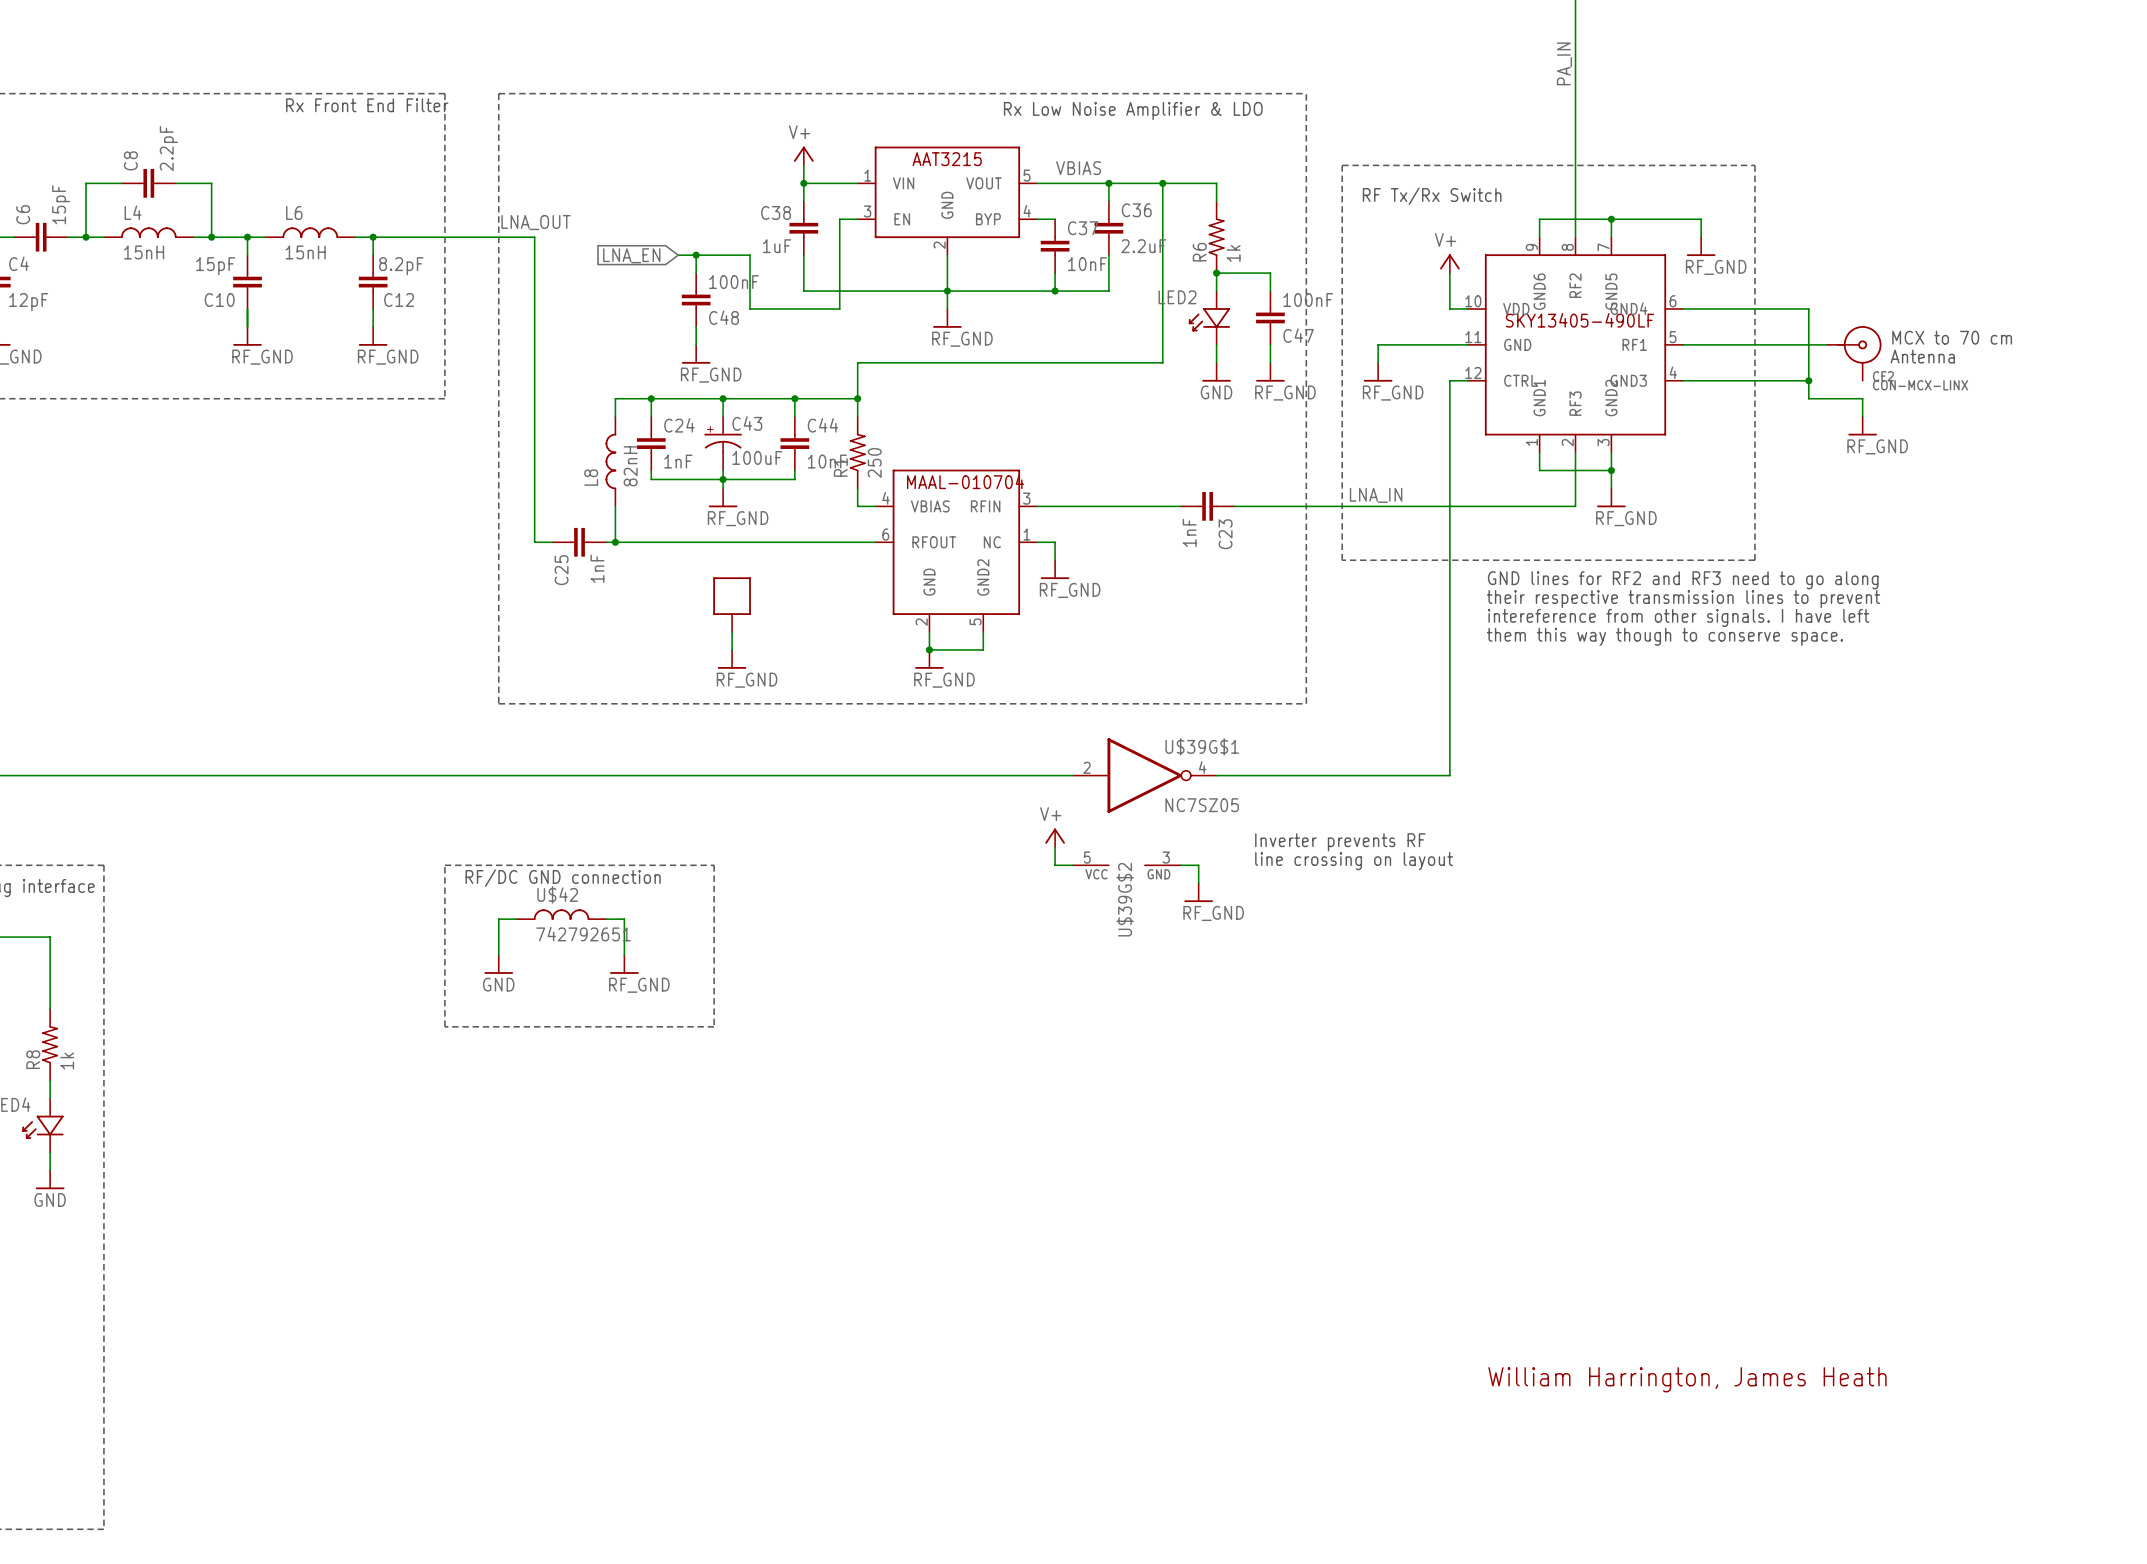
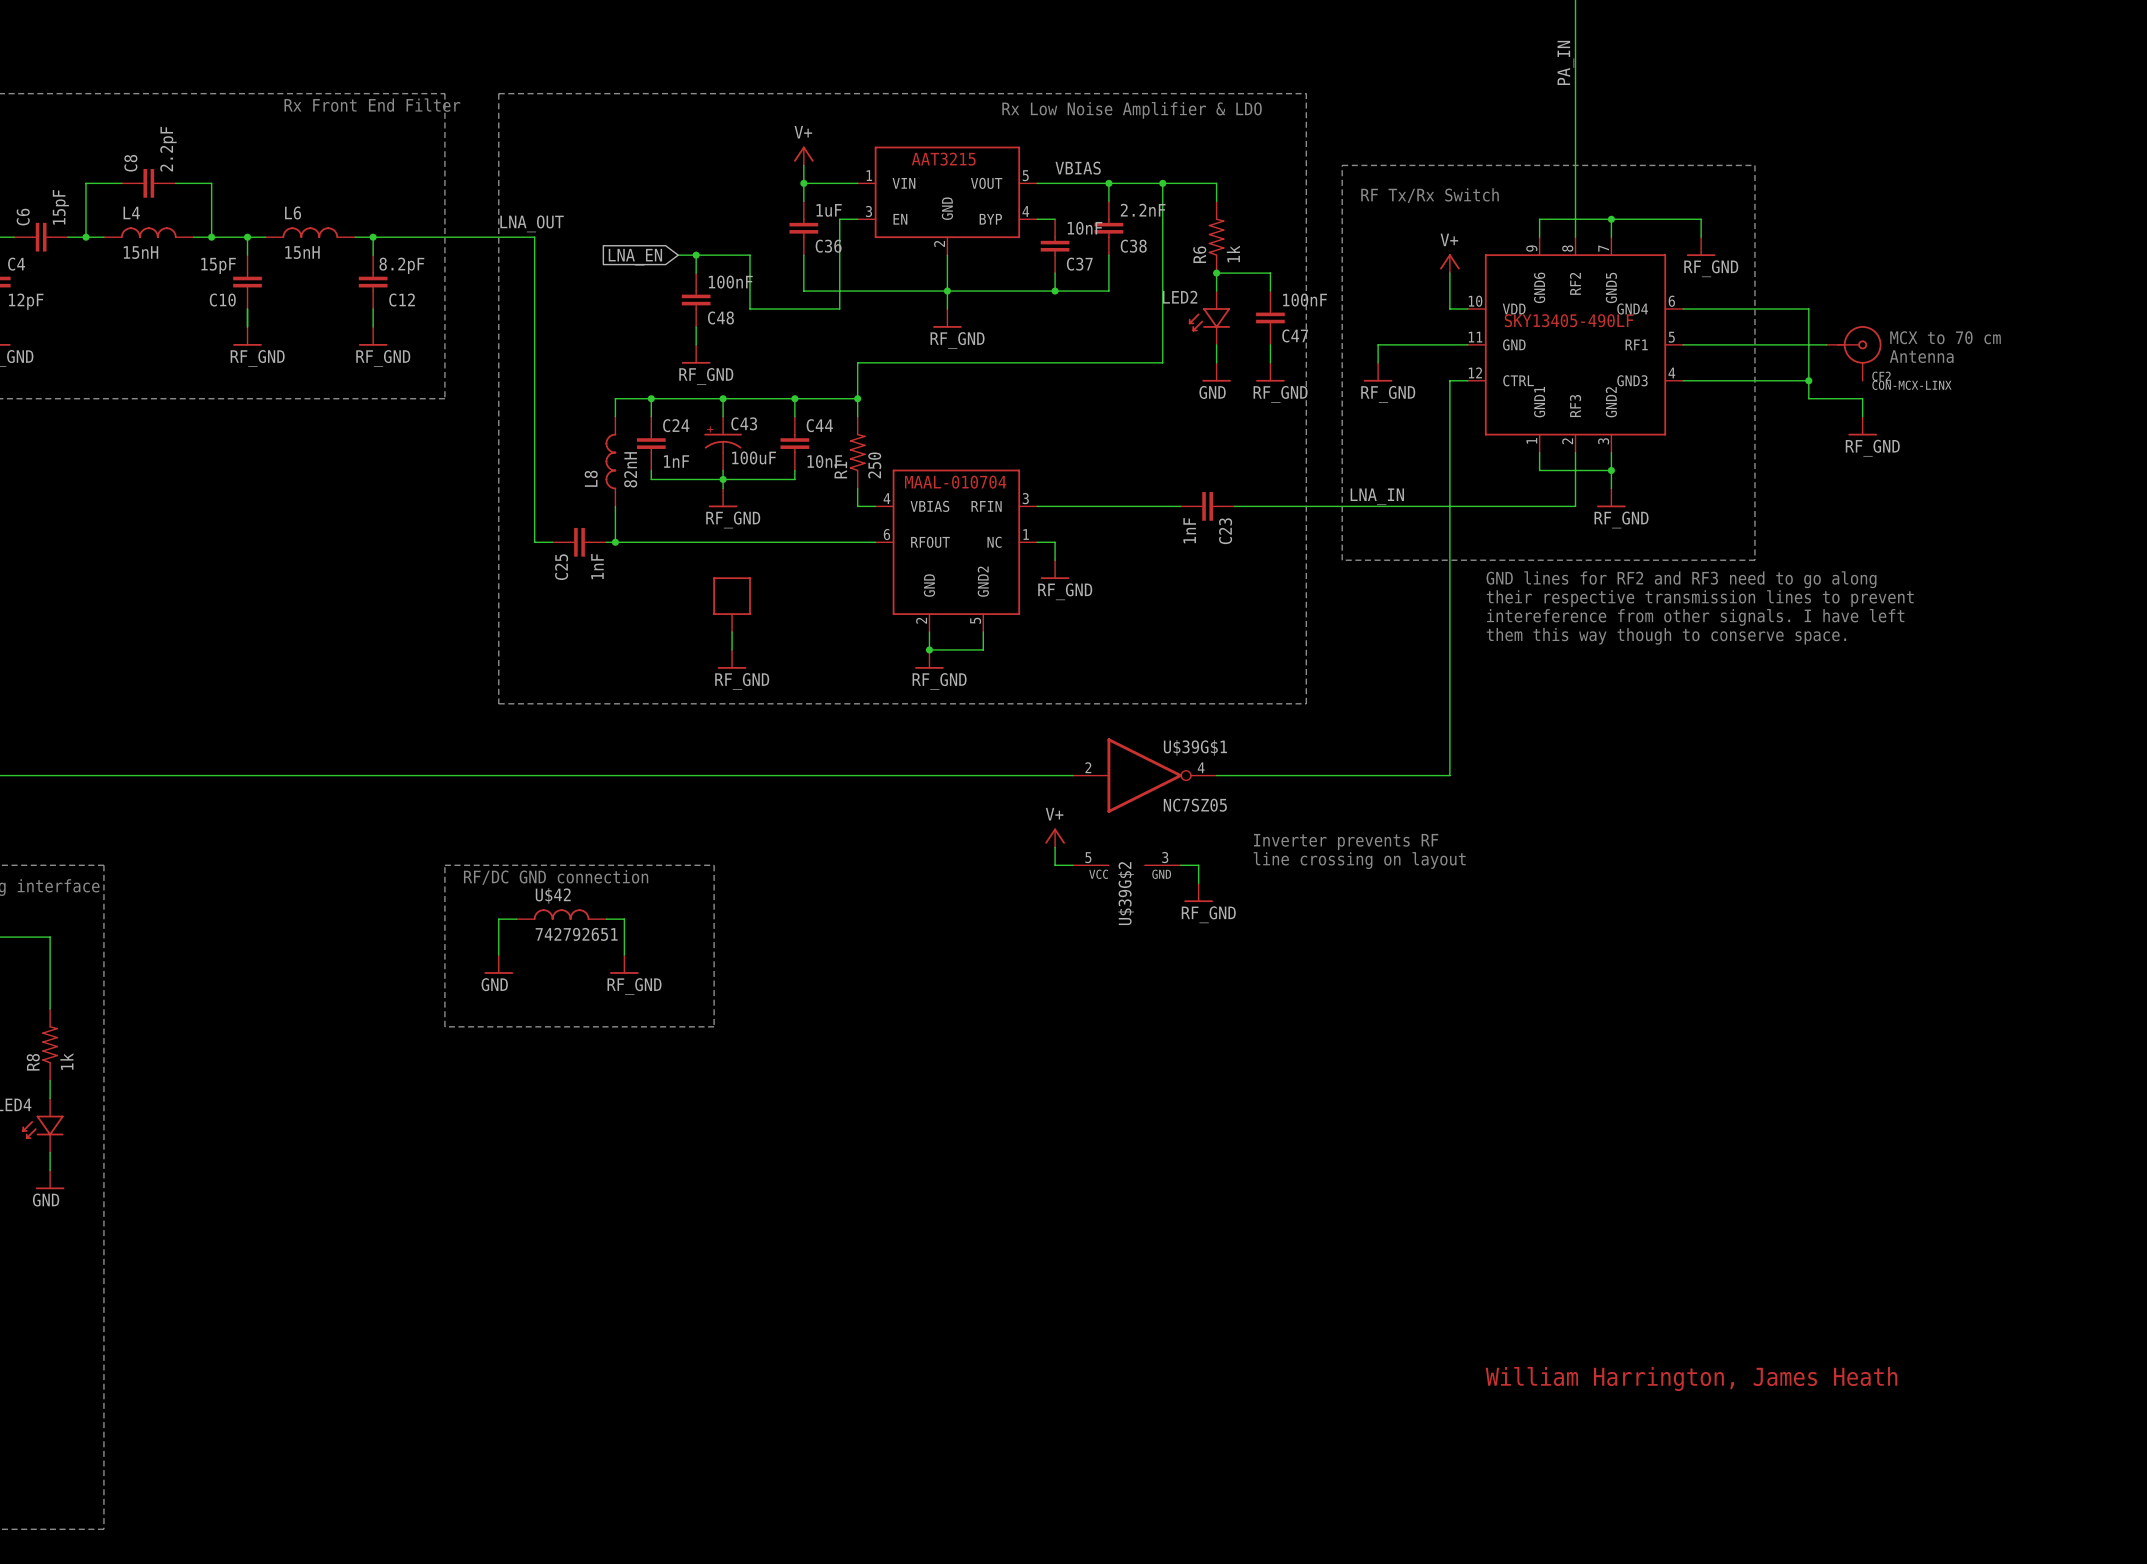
C36 name: C36 (1136, 210) -> C38 (1133, 246)
C38 name: C38 (776, 212) -> C36 (828, 246)
C37 name position: C37 (1083, 228) -> C37 (1079, 264)
C38 value position: 1uF (777, 246) -> 1uF (829, 210)
C36 value: 2.2uF (1143, 246) -> 2.2nF (1143, 210)
C37 value position: 10nF (1087, 264) -> 10nF (1084, 228)

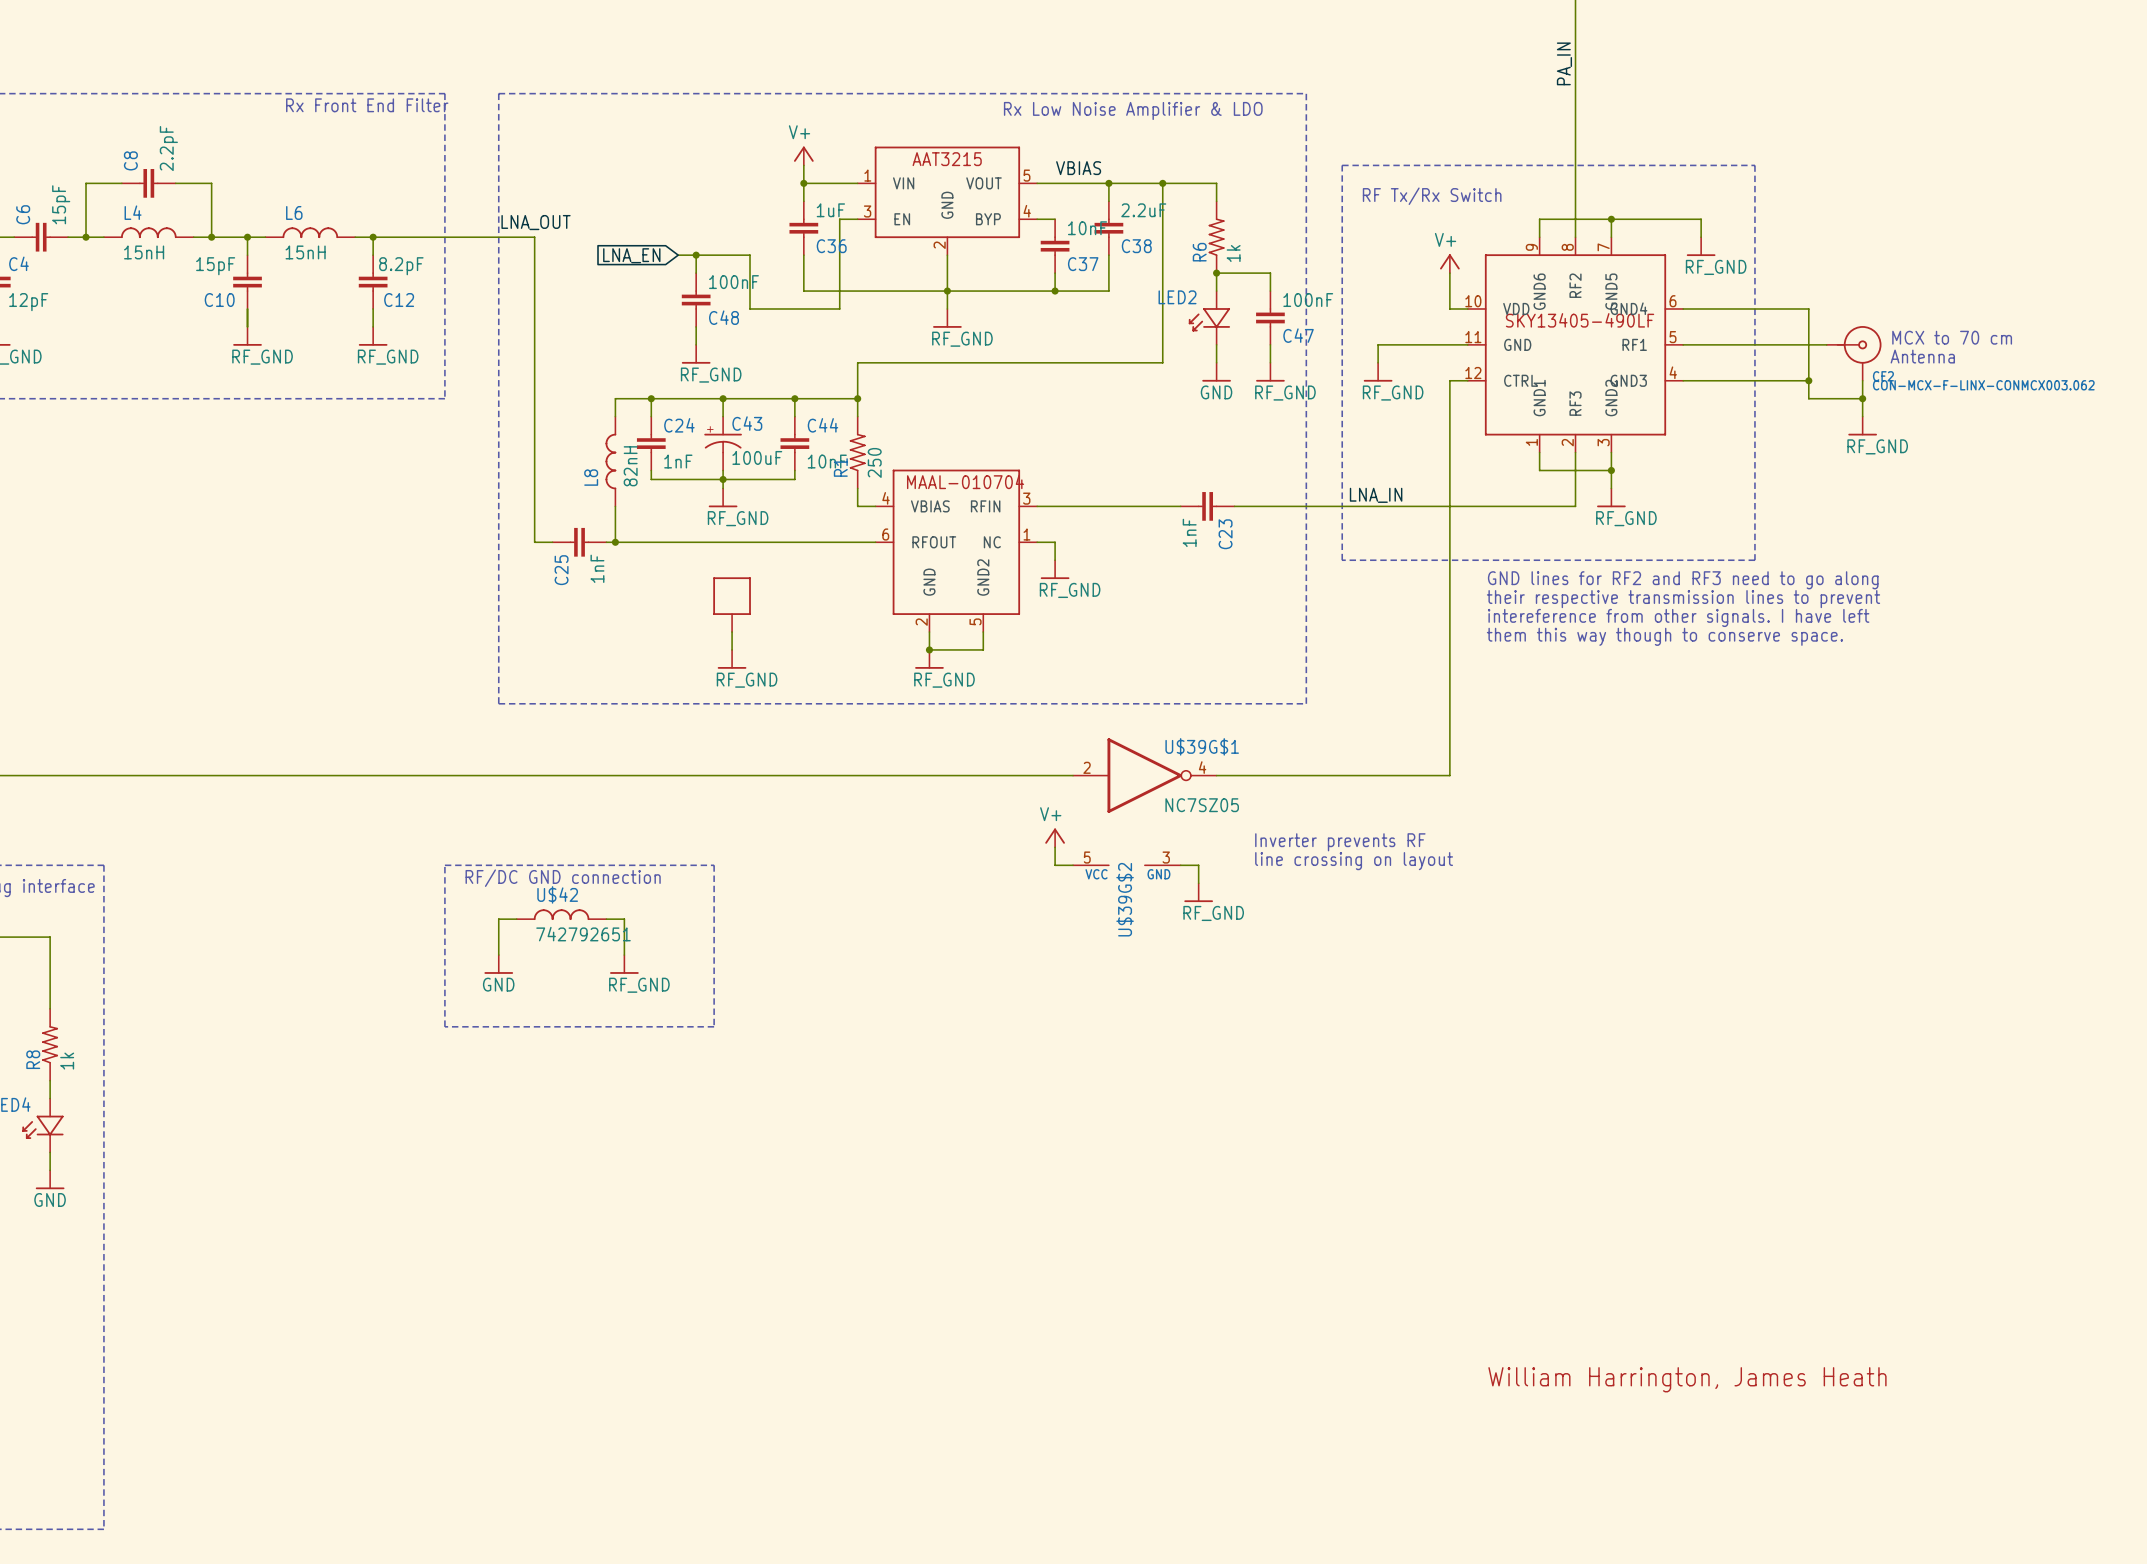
C38 value: 2.2nF (1143, 210) -> 2.2uF (1143, 210)
wire: none -> (1862, 380) (1862, 398)
CF2 value: CON-MCX-LINX (1911, 385) -> CON-MCX-F-LINX-CONMCX003.062 (1983, 385)
junction: none -> (1862, 398)

